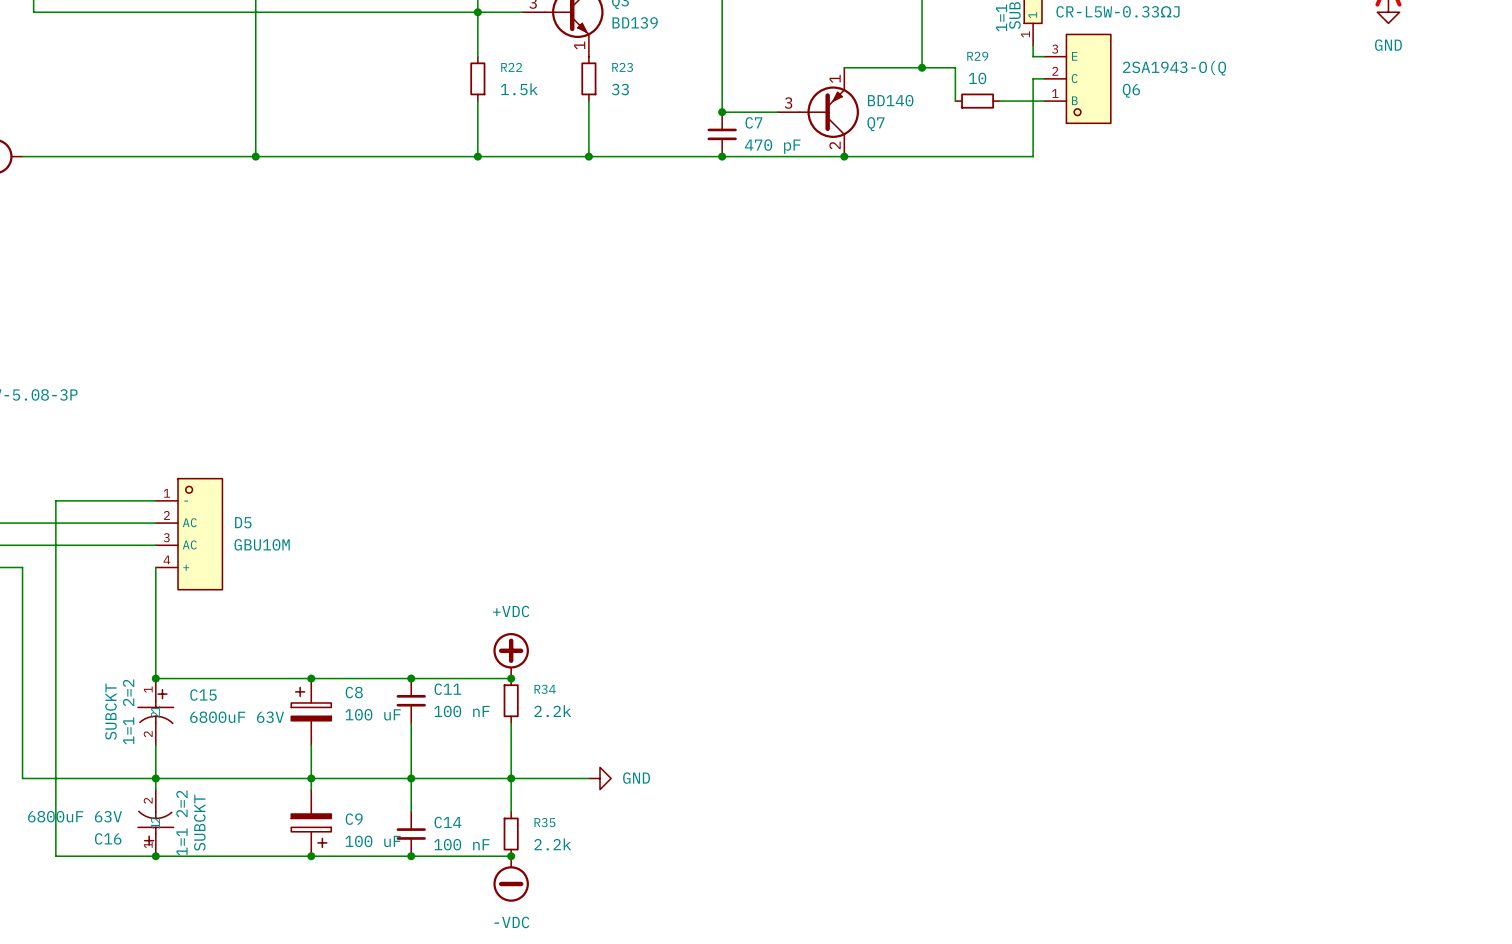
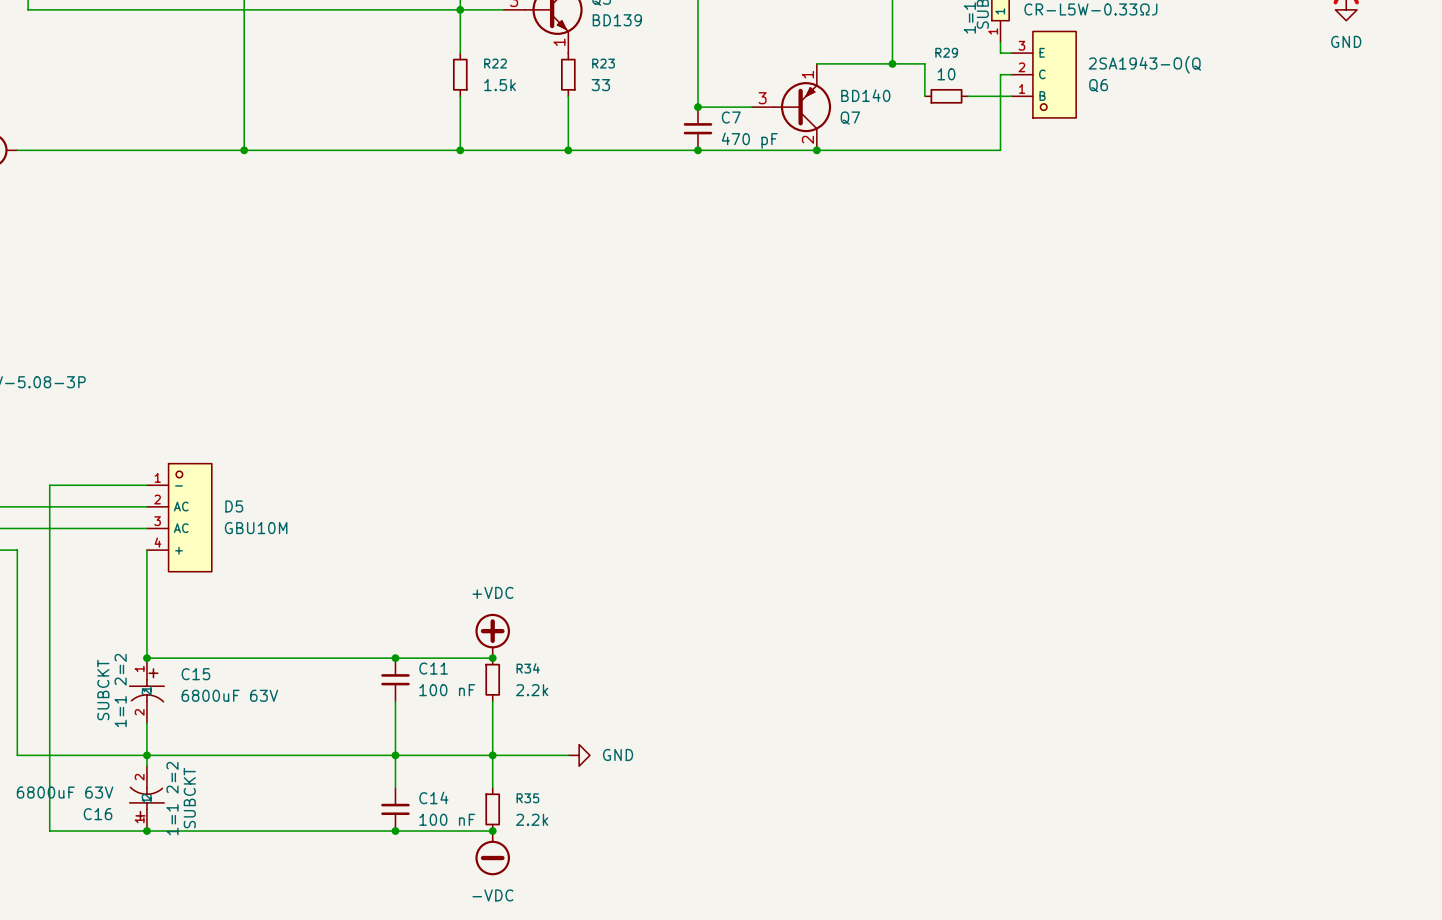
junction: (311, 678) -> none
C8: 100 uF (311, 711) -> none
wire: (311, 745) (311, 789) -> none
junction: (311, 778) -> none
C9: 100 uF (311, 822) -> none
junction: (311, 856) -> none

